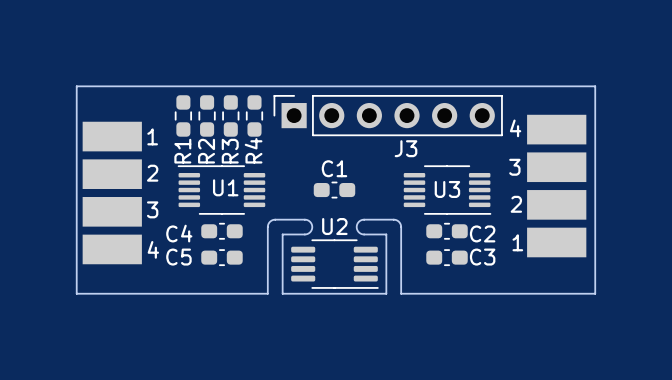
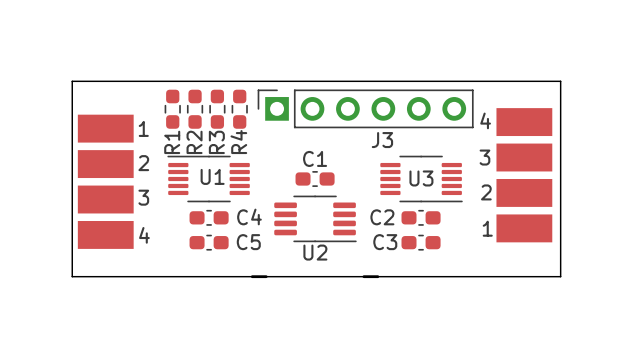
U2 name position: U2 (334, 226) -> U2 (315, 252)
C4 name position: C4 (179, 233) -> C4 (249, 216)
C2 name position: C2 (482, 233) -> C2 (382, 217)
C5 name position: C5 (178, 257) -> C5 (248, 242)
C3 name position: C3 (482, 257) -> C3 (385, 242)
U2 position: (334, 264) -> (315, 218)
board edge: (267, 293) (268, 223) (274, 219) (306, 219) (312, 226) (308, 233) (282, 234) (282, 293) -> (252, 276) (266, 276)
board edge: (386, 293) (386, 234) (360, 233) (356, 226) (362, 219) (394, 219) (400, 223) (401, 293) -> (363, 276) (377, 276)

